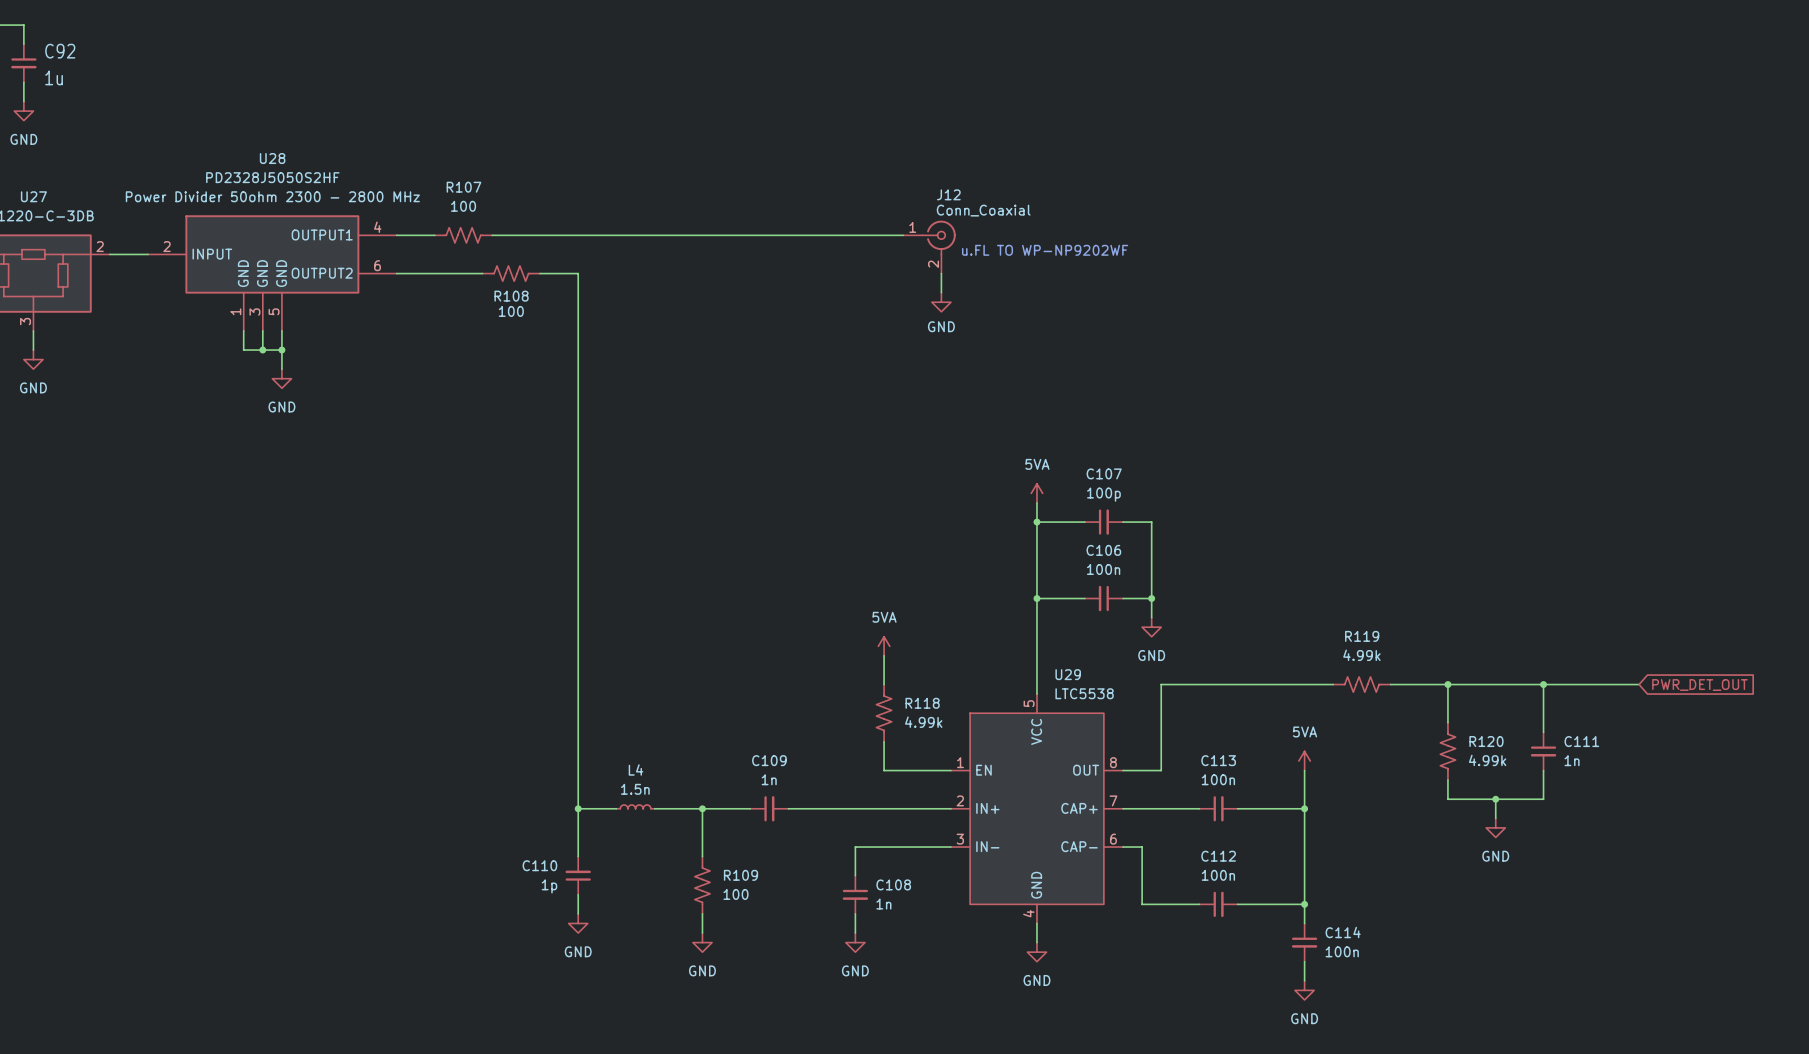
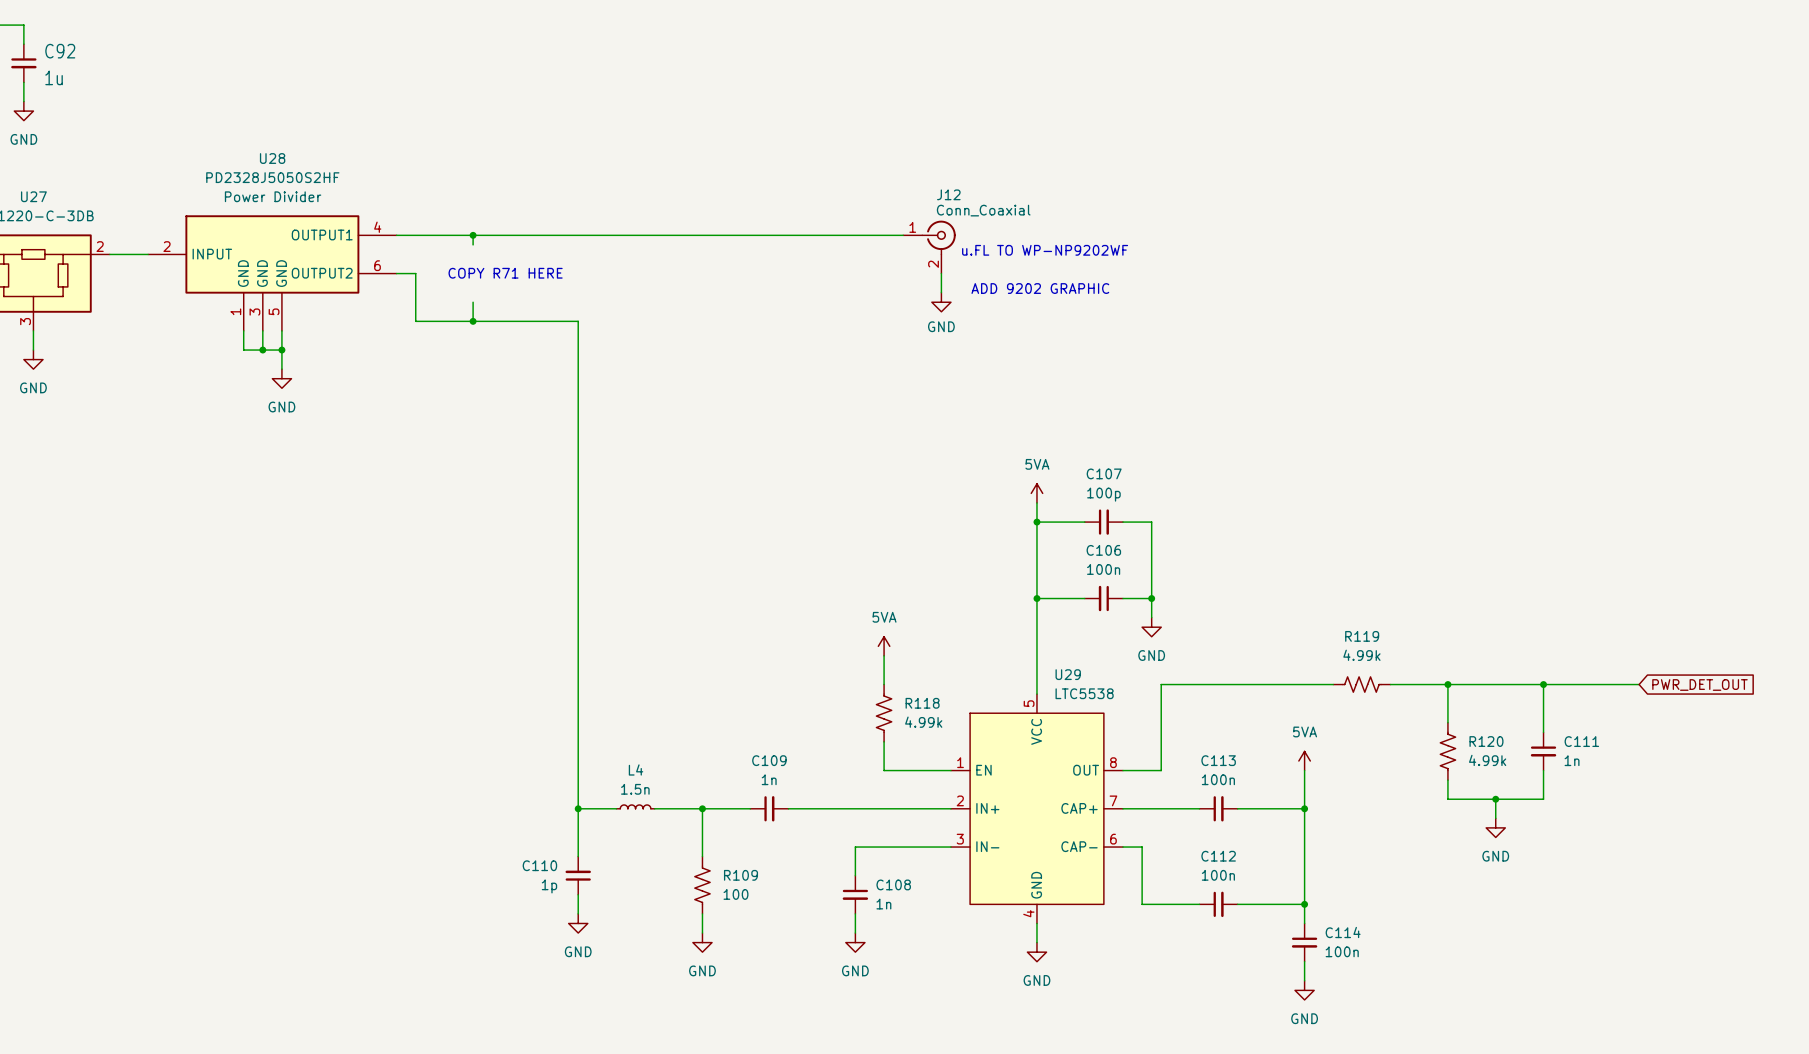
U28 text: Power Divider 50ohm 2300 - 2800 MHz (272, 196) -> Power Divider (273, 196)
R107: 100 (463, 235) -> none
wire: none -> (473, 235) (473, 244)
junction: none -> (473, 235)
wire: (415, 273) (482, 273) -> (415, 273) (415, 321) (578, 321)
text: none -> COPY R71 HERE (505, 273)
R108: 100 (511, 273) -> none
wire: (539, 273) (578, 273) (578, 321) -> none
text: none -> ADD 9202 GRAPHIC (1040, 288)
wire: none -> (473, 302) (473, 321)
junction: none -> (473, 321)

